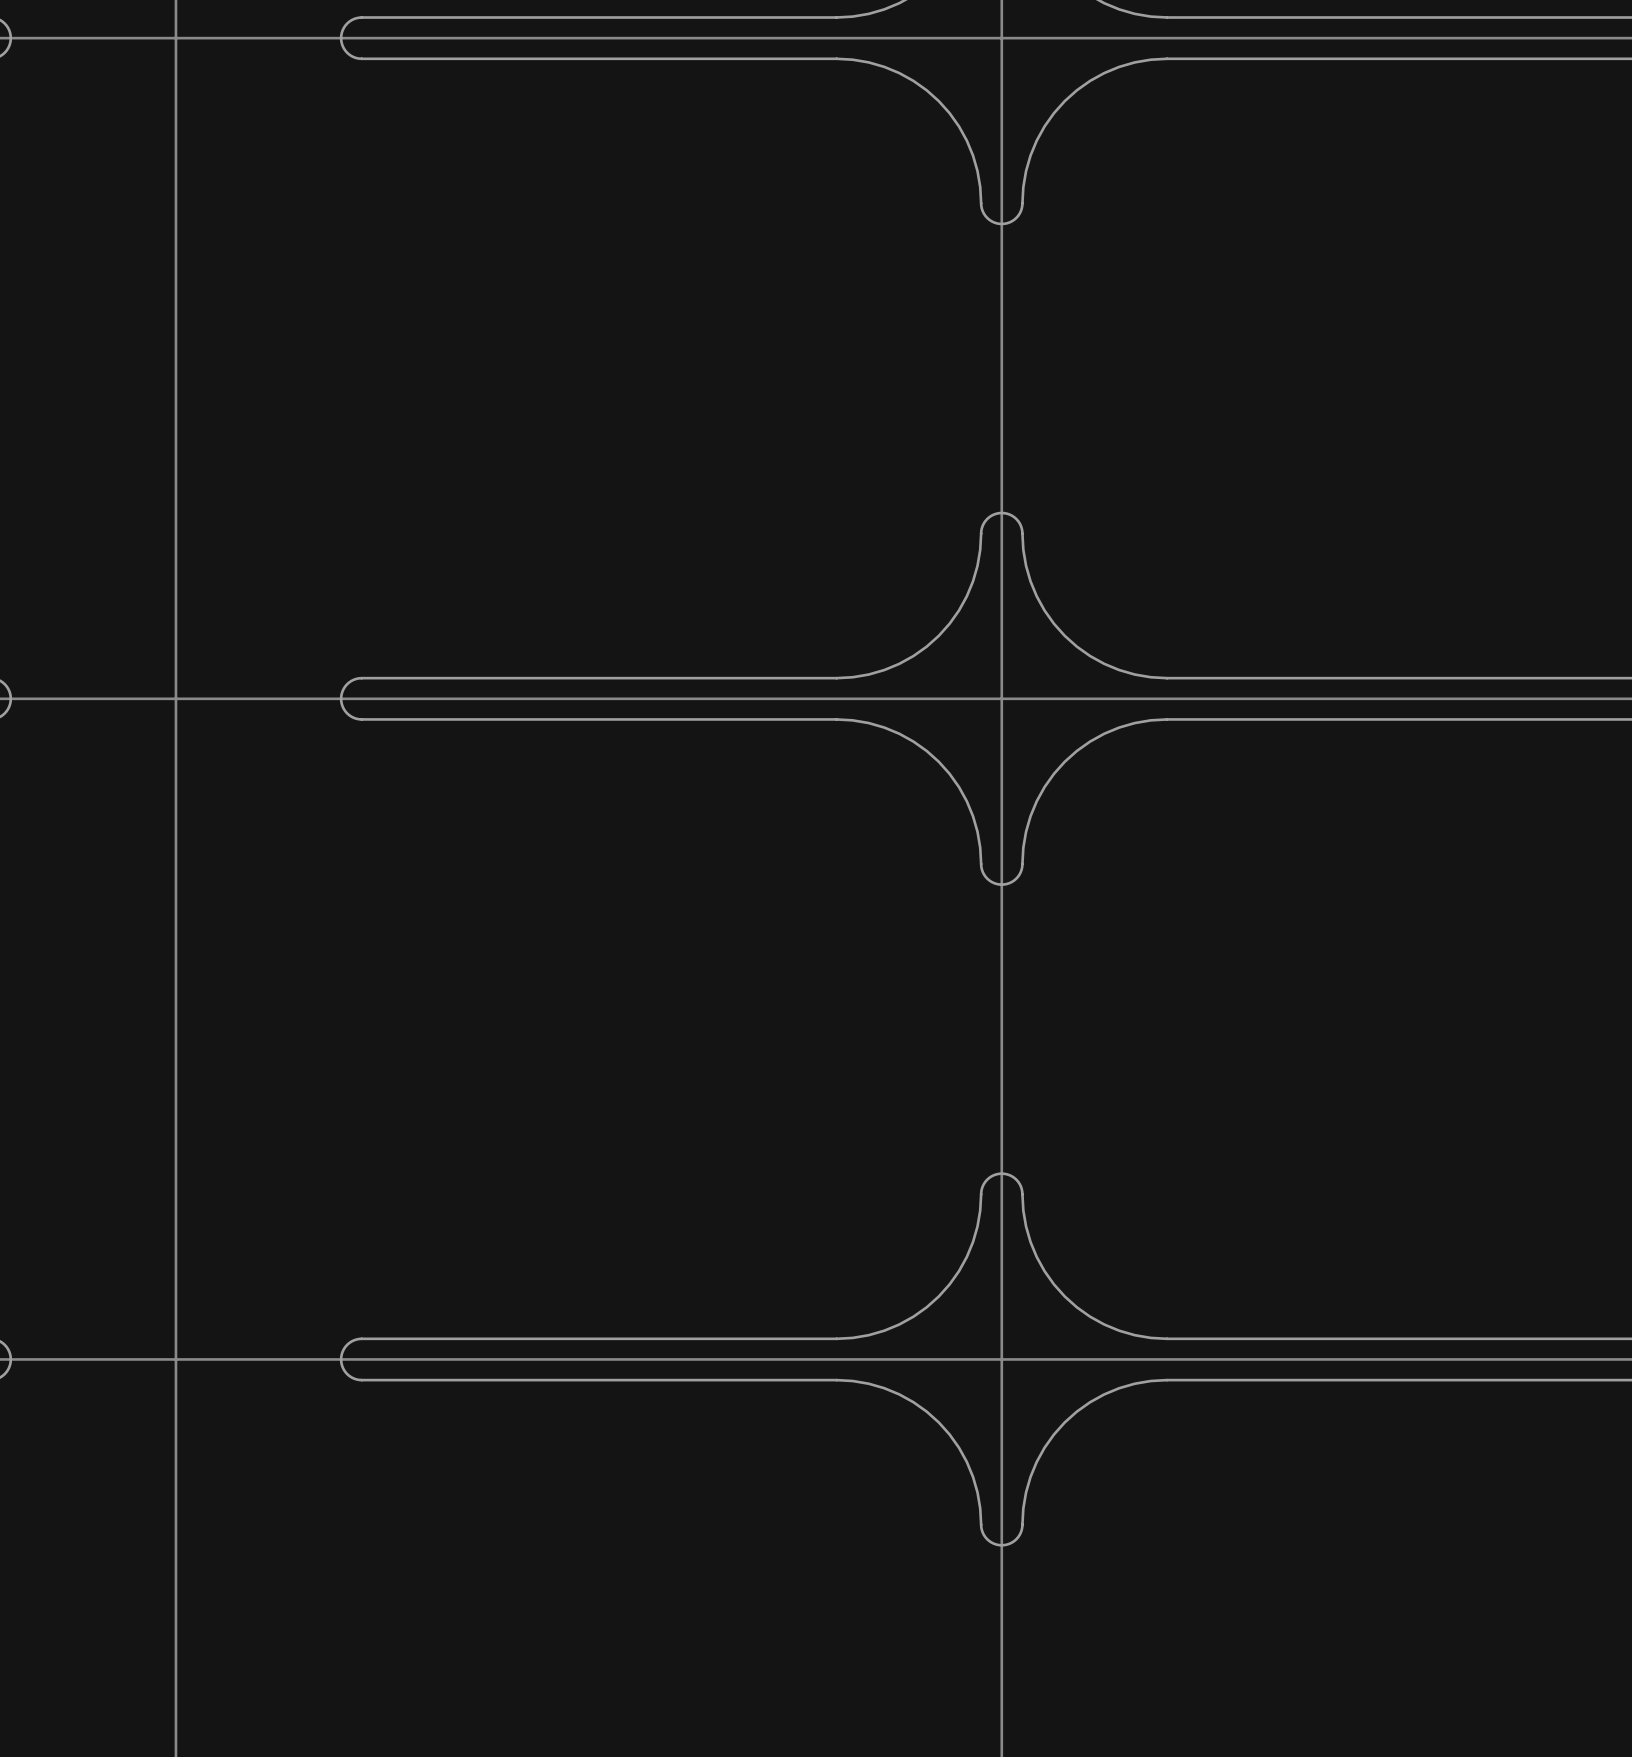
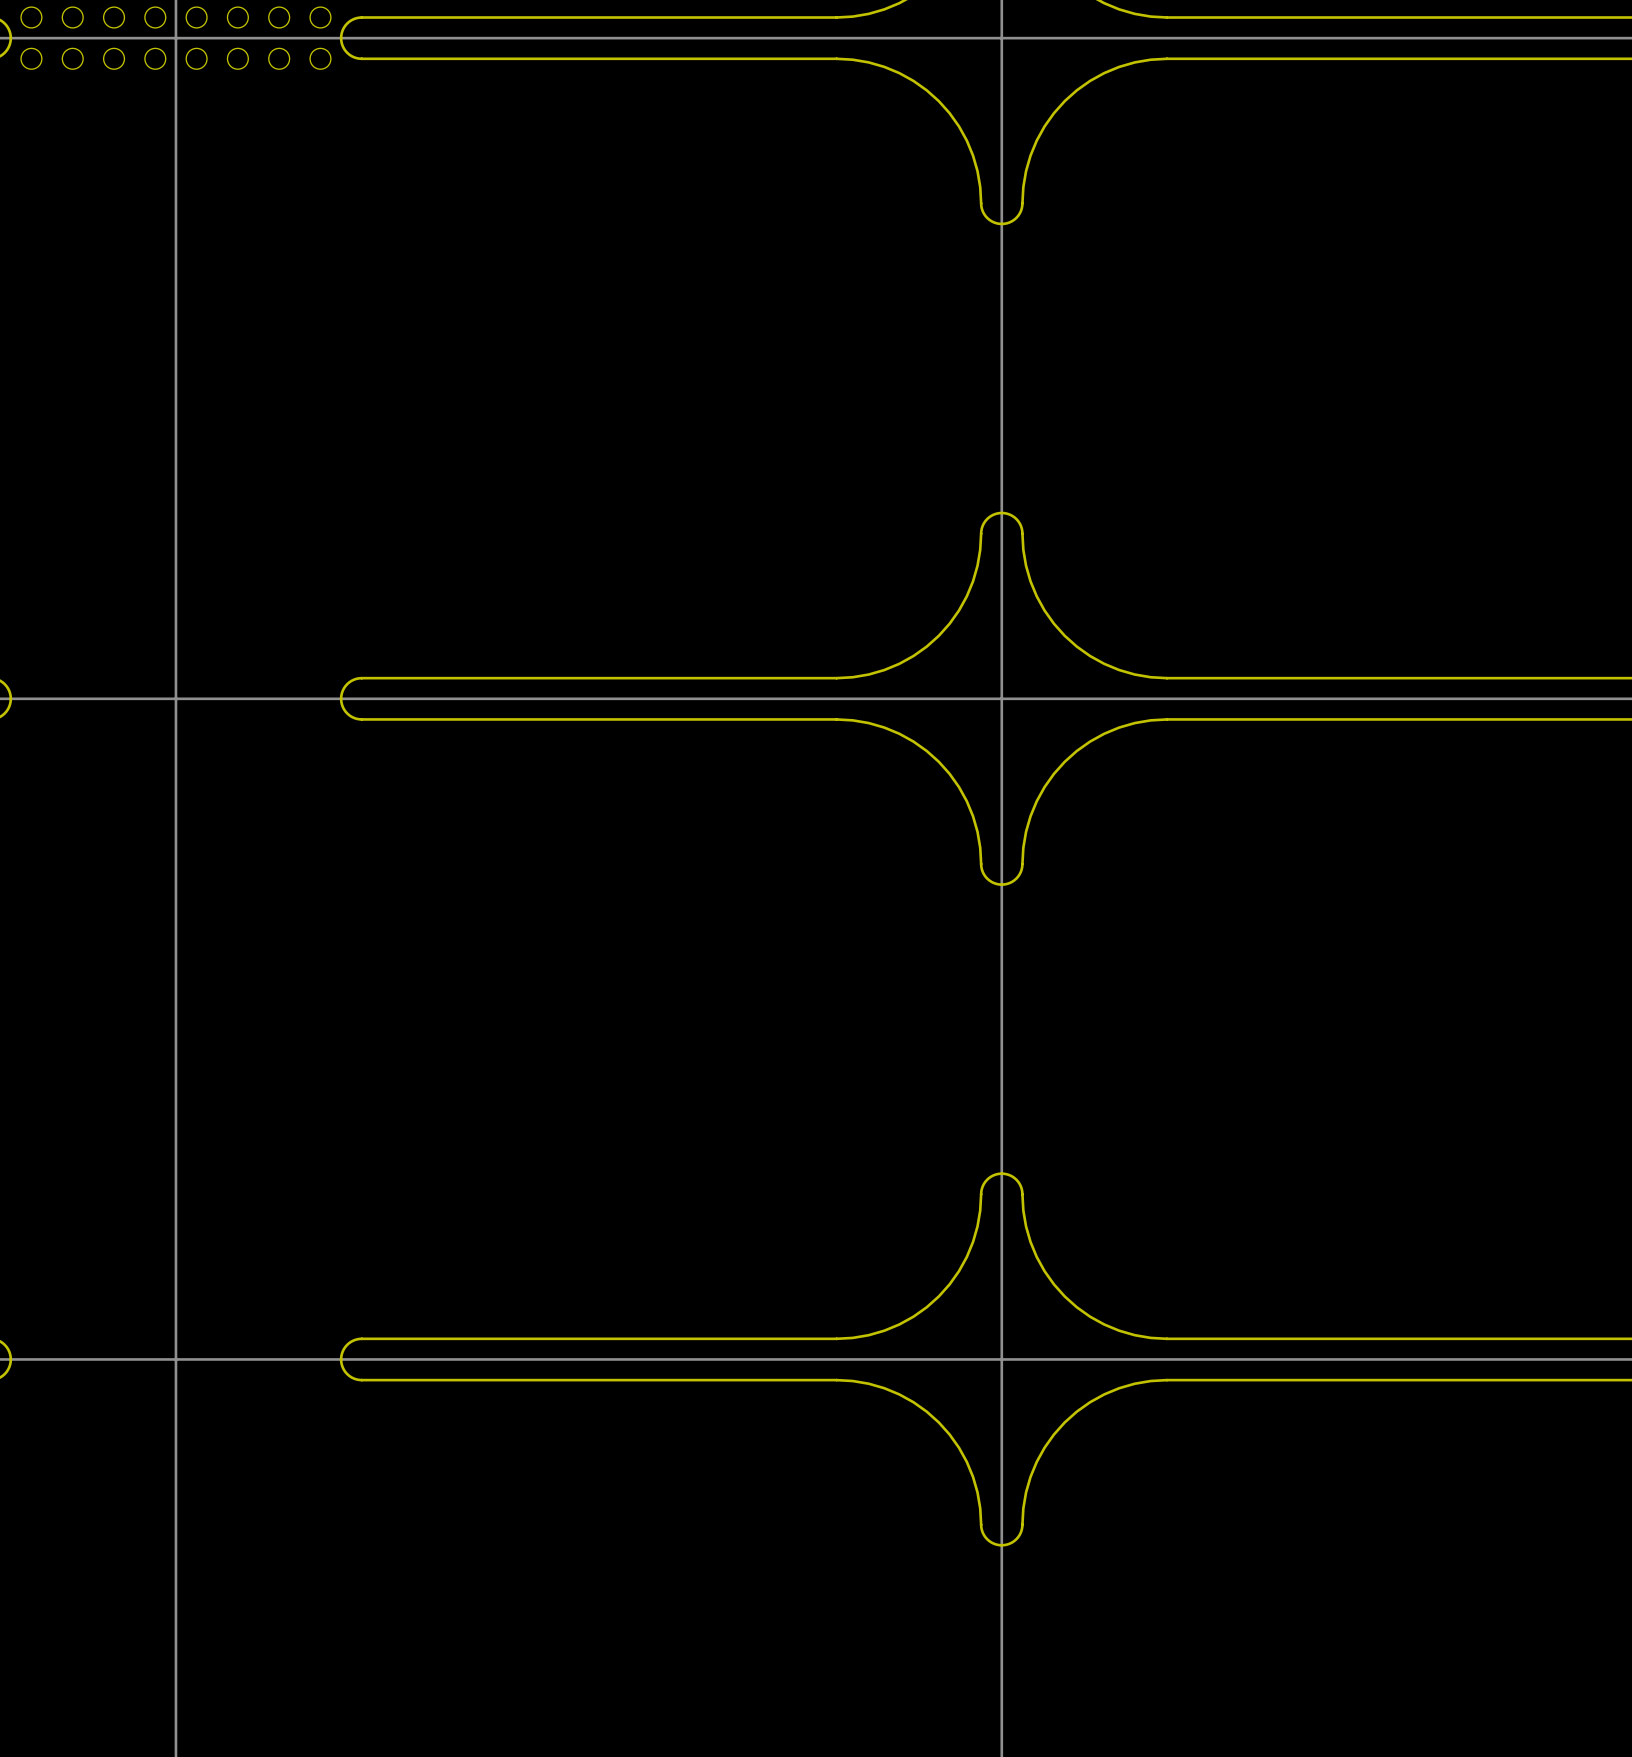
round board edge: none -> [20, 6, 43, 29]
round board edge: none -> [62, 6, 84, 29]
round board edge: none -> [103, 6, 125, 29]
round board edge: none -> [144, 6, 166, 29]
round board edge: none -> [186, 6, 208, 29]
round board edge: none -> [227, 6, 249, 29]
round board edge: none -> [268, 6, 290, 29]
round board edge: none -> [309, 6, 332, 29]
round board edge: none -> [20, 48, 43, 70]
round board edge: none -> [62, 48, 84, 70]
round board edge: none -> [103, 48, 125, 70]
round board edge: none -> [144, 48, 166, 70]
round board edge: none -> [186, 48, 208, 70]
round board edge: none -> [227, 48, 249, 70]
round board edge: none -> [268, 48, 290, 70]
round board edge: none -> [309, 48, 332, 70]

